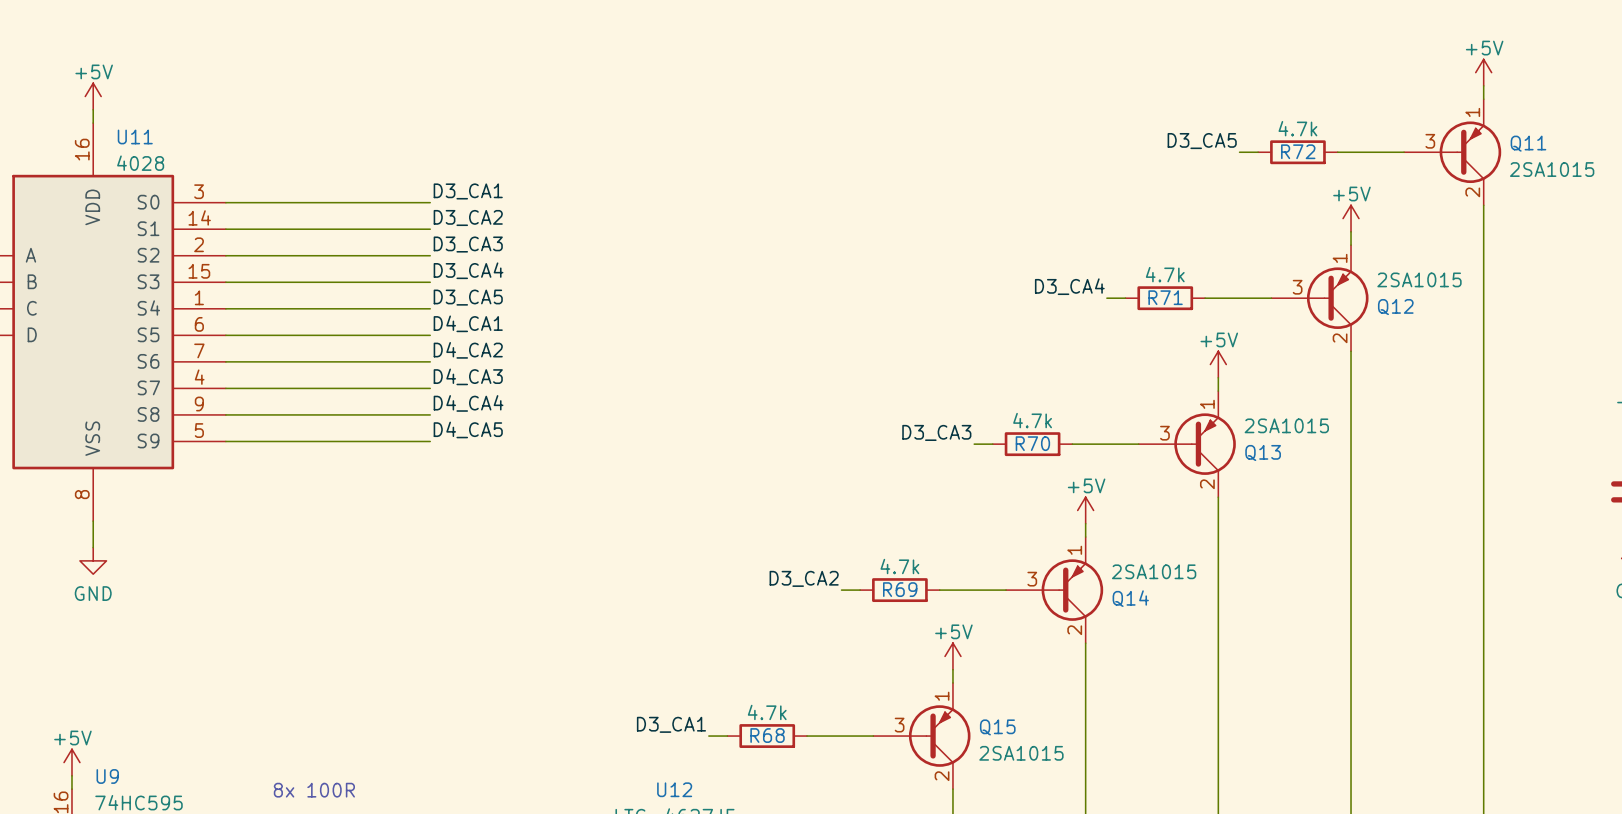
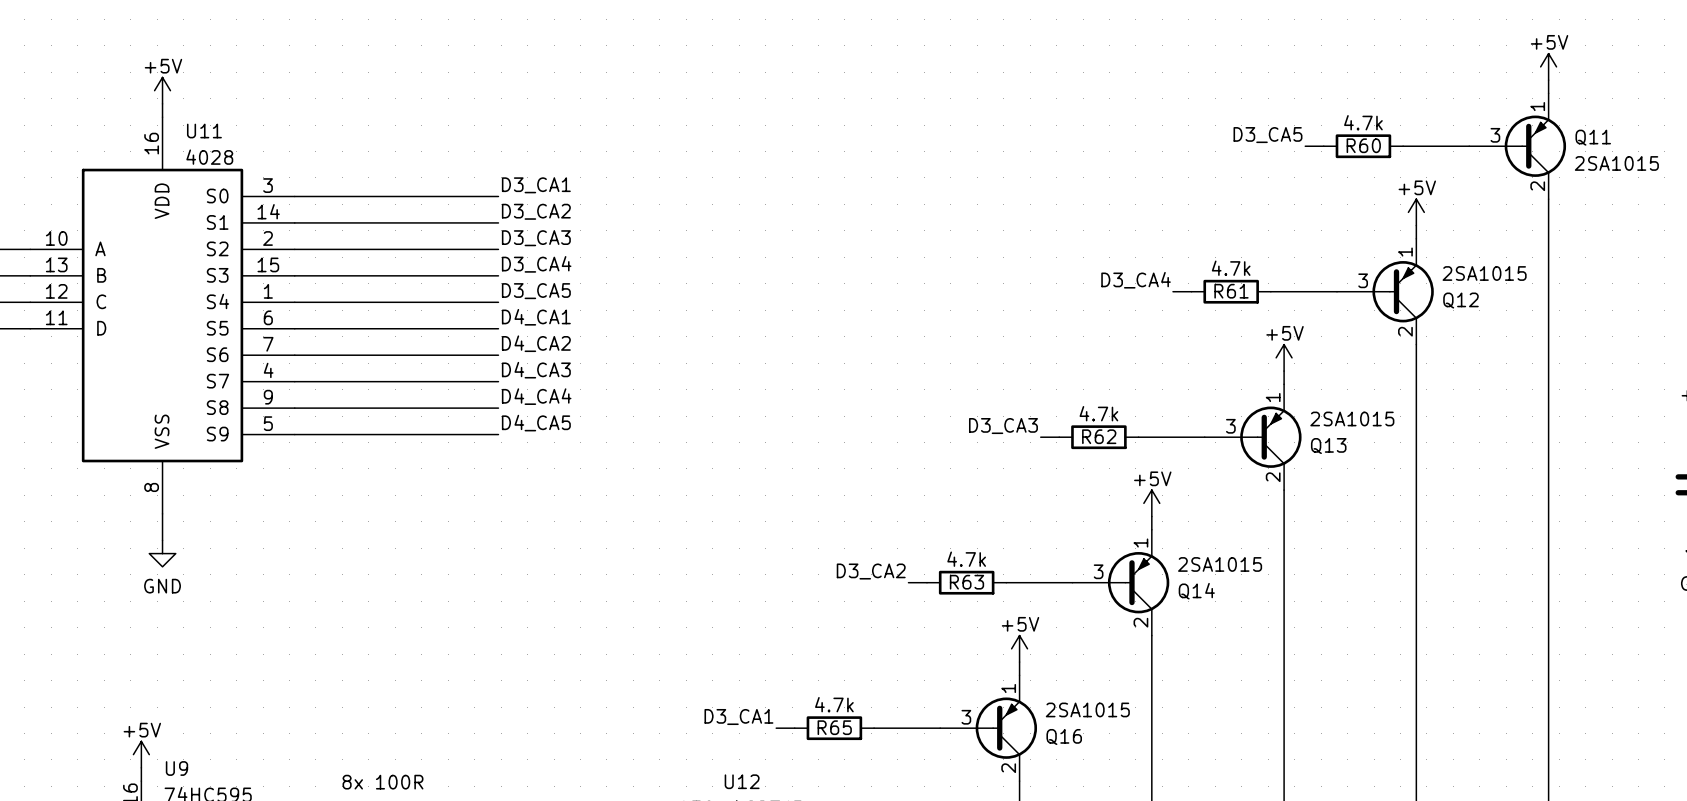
R72 name: R72 (1298, 151) -> R60 (1363, 145)
R71 name: R71 (1165, 297) -> R61 (1231, 291)
R70 name: R70 (1032, 443) -> R62 (1099, 436)
R69 name: R69 (900, 589) -> R63 (966, 582)
Q15 name: Q15 (997, 727) -> Q16 (1064, 737)
R68 name: R68 (767, 735) -> R65 (834, 727)
Q15 value position: 2SA1015 (1021, 753) -> 2SA1015 (1087, 709)

